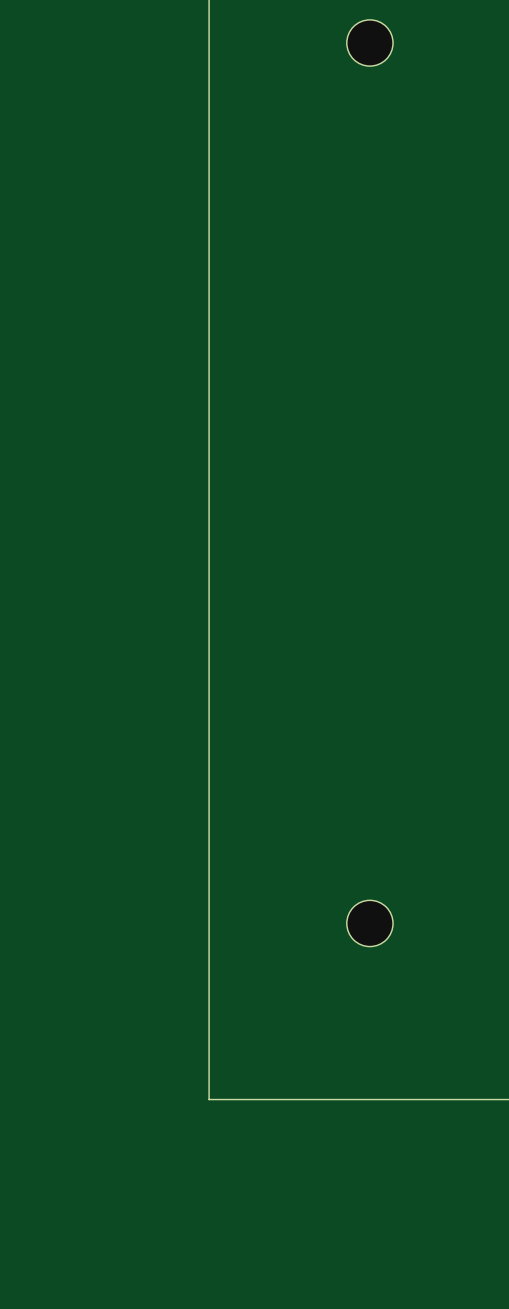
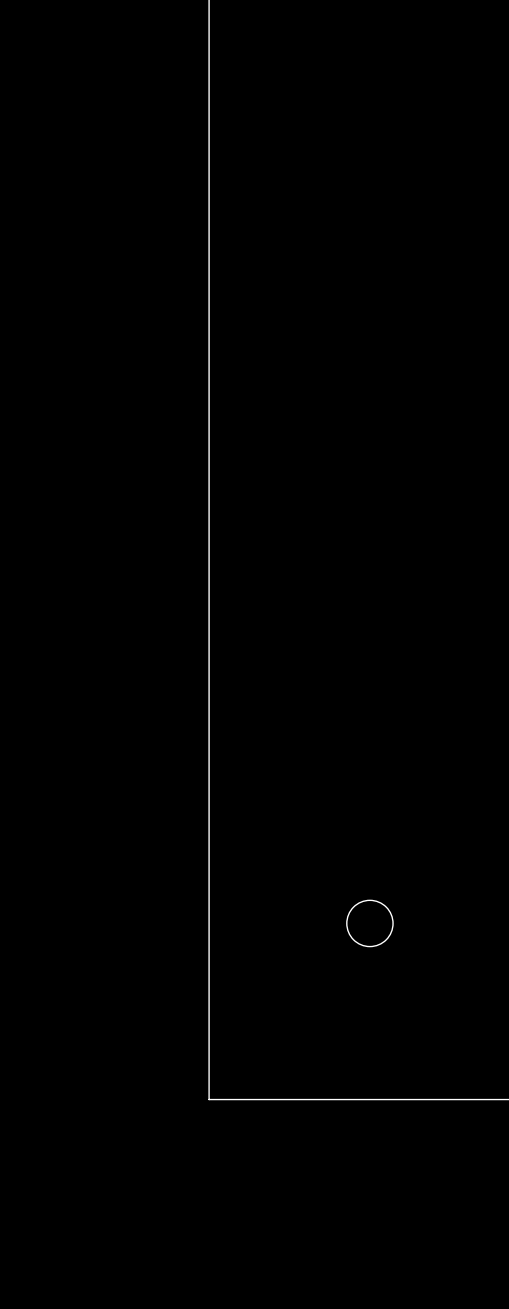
hole: (369, 42) -> none

